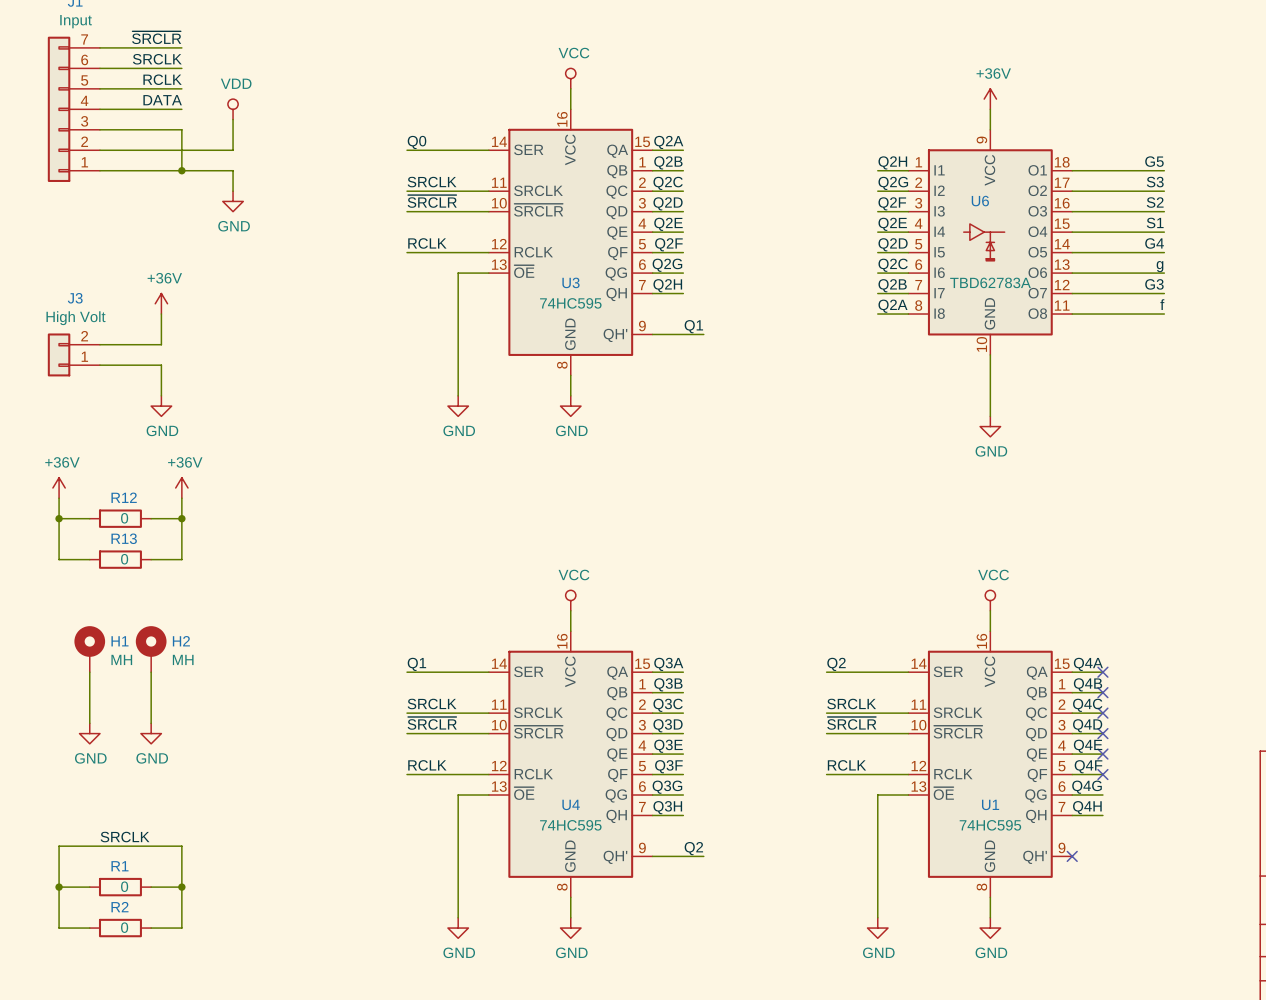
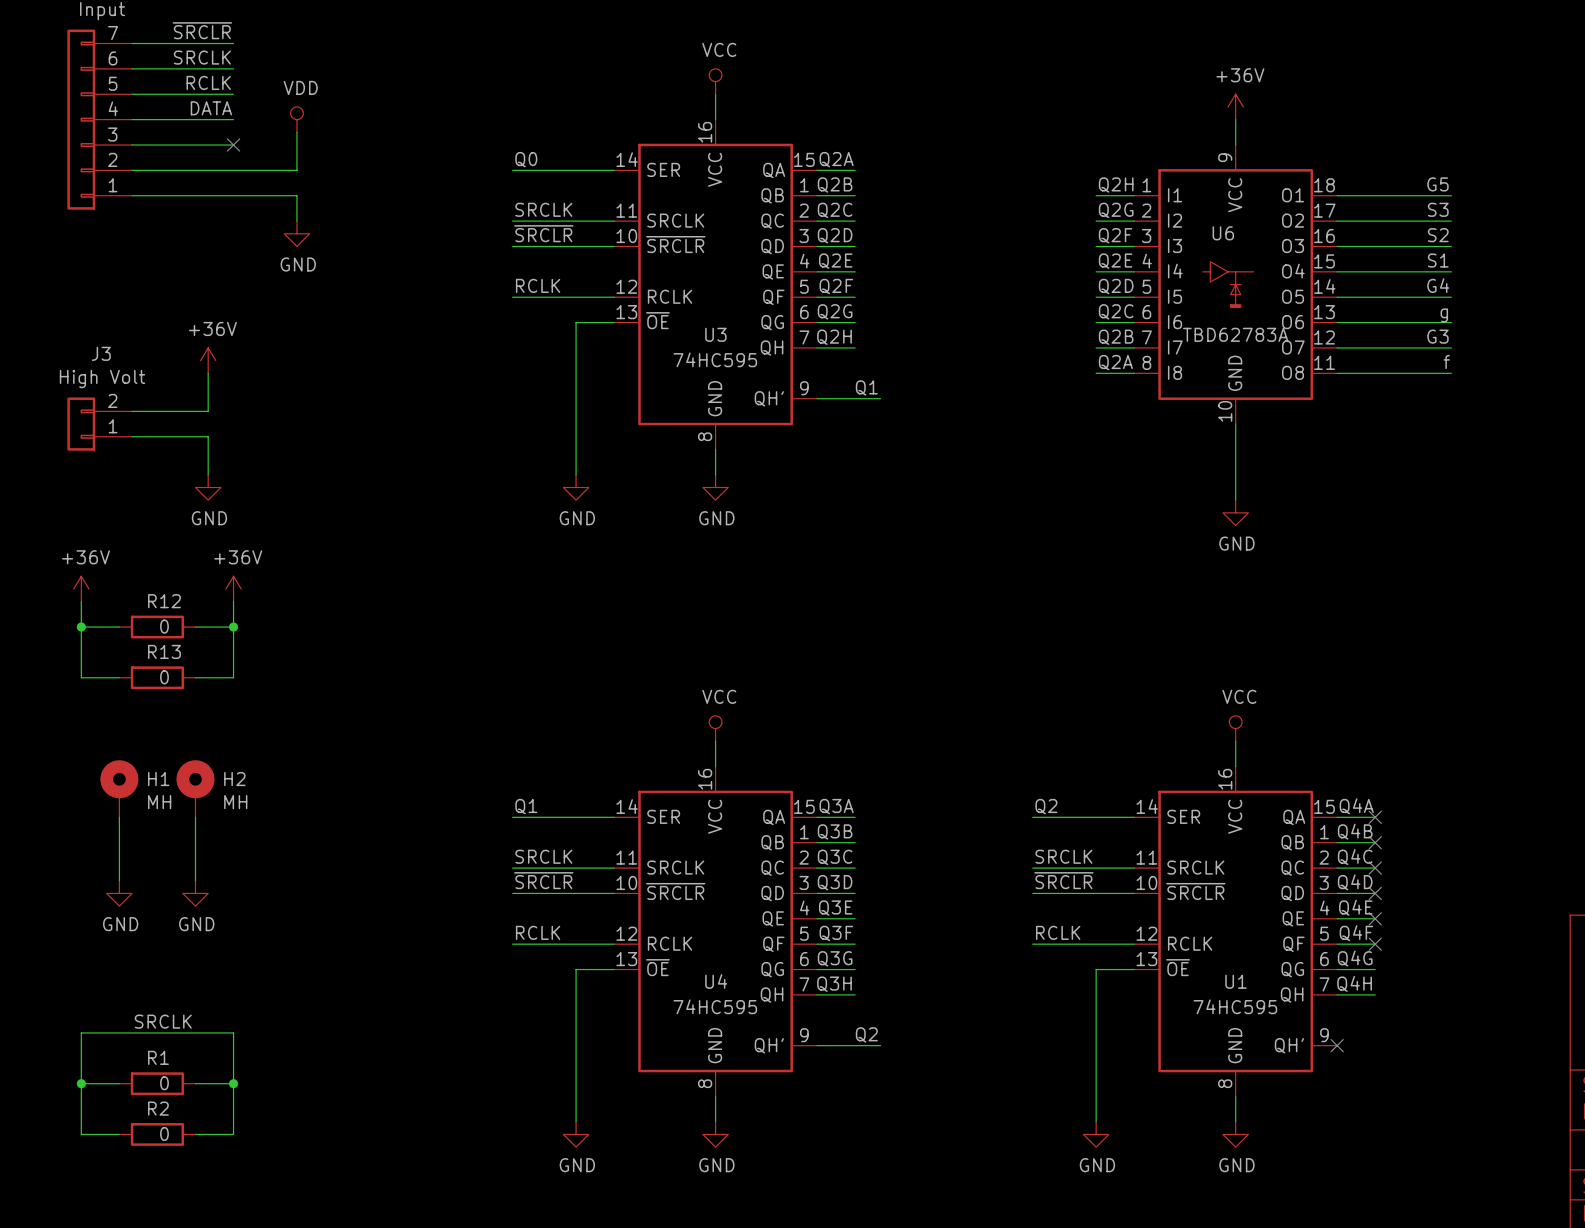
wire: (181, 129) (181, 170) -> none
no-connect mark: none -> (233, 144)
junction: (181, 170) -> none

